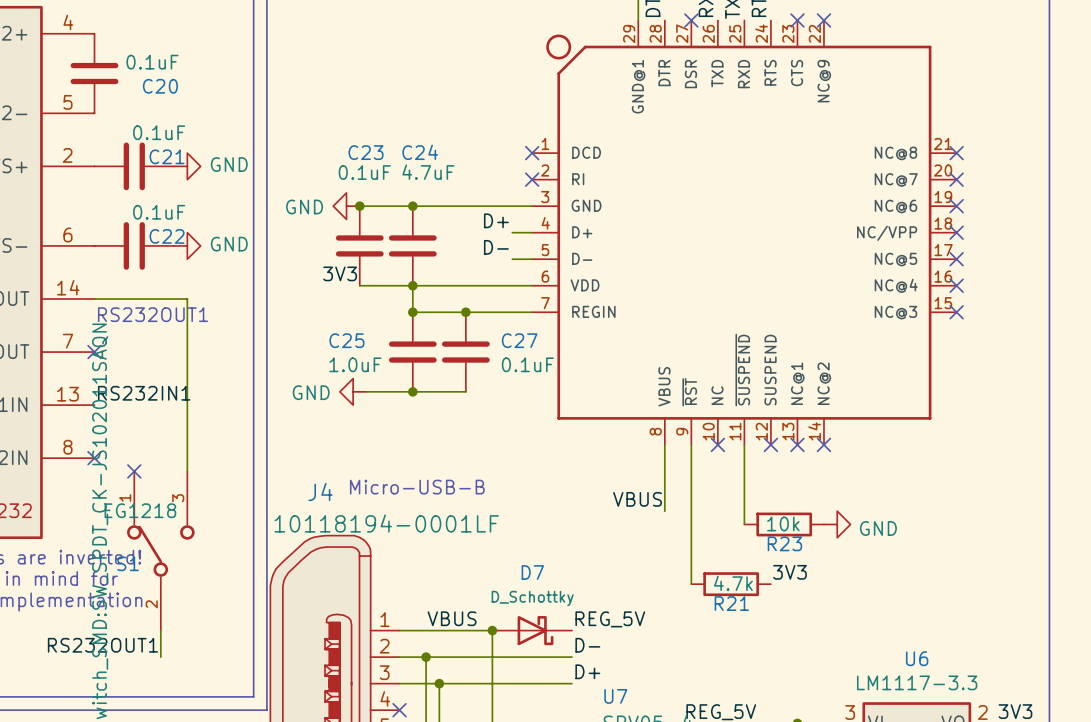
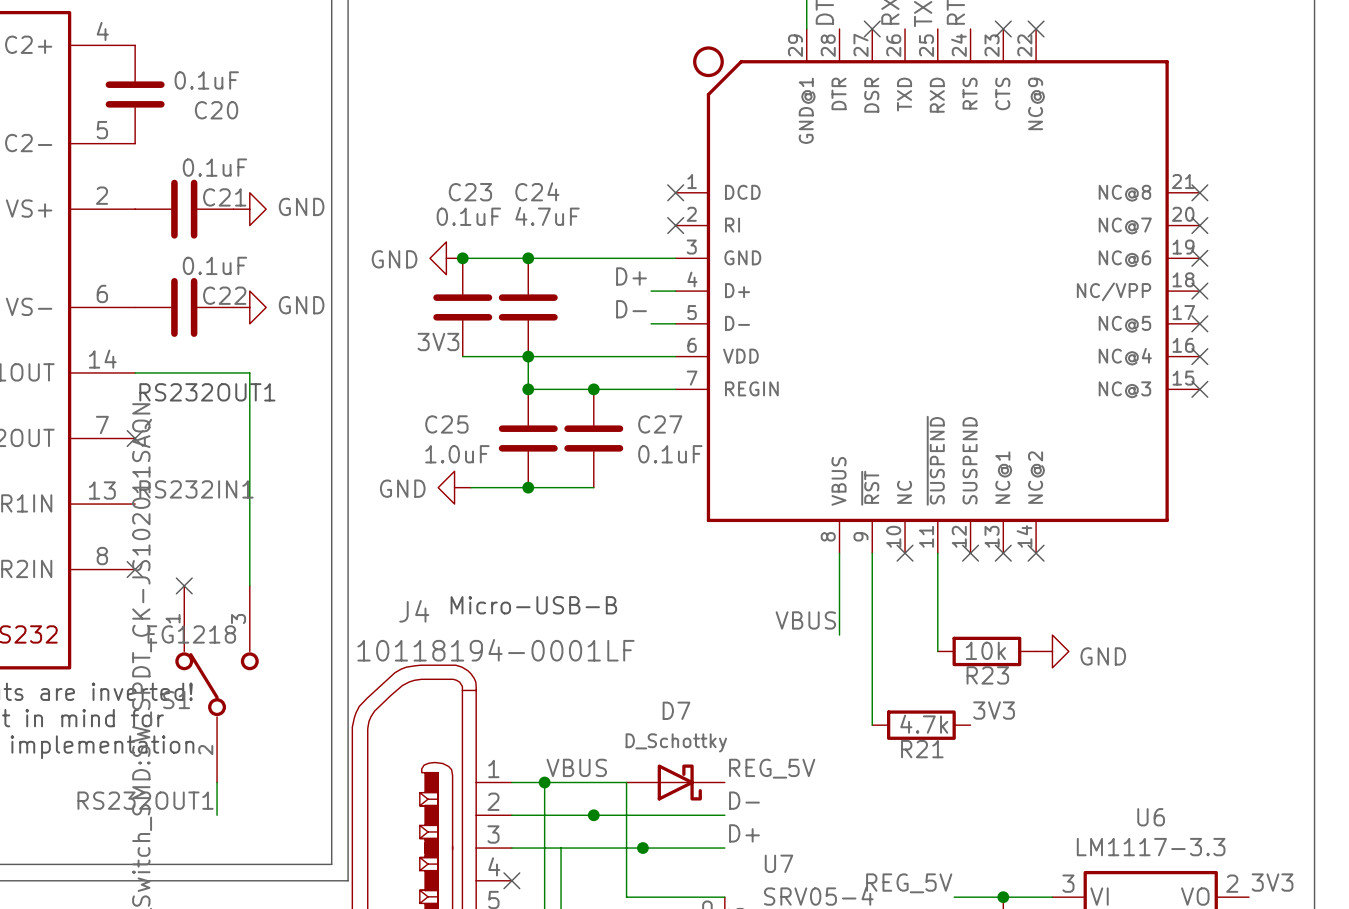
wire: none -> (544, 782) (544, 815)
junction: none -> (544, 782)
junction: (492, 630) -> none
junction: (426, 657) -> none
junction: none -> (593, 815)
junction: (439, 683) -> none
junction: none -> (642, 848)

